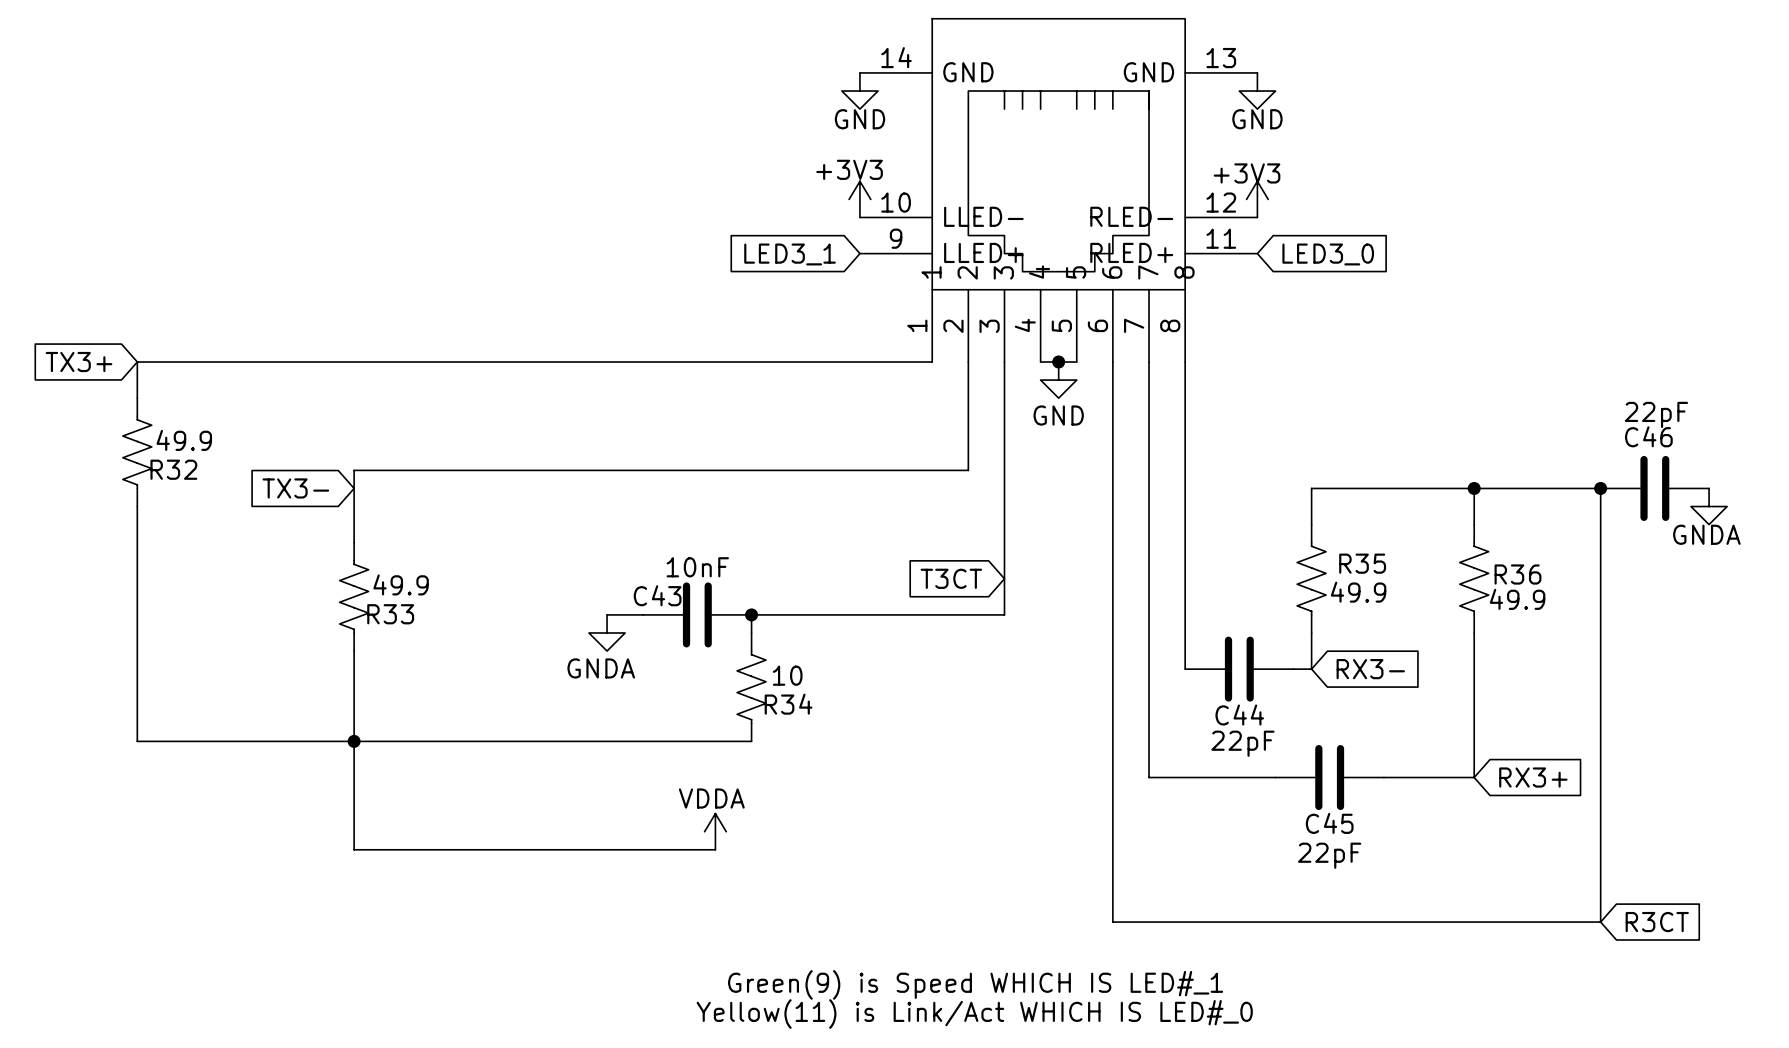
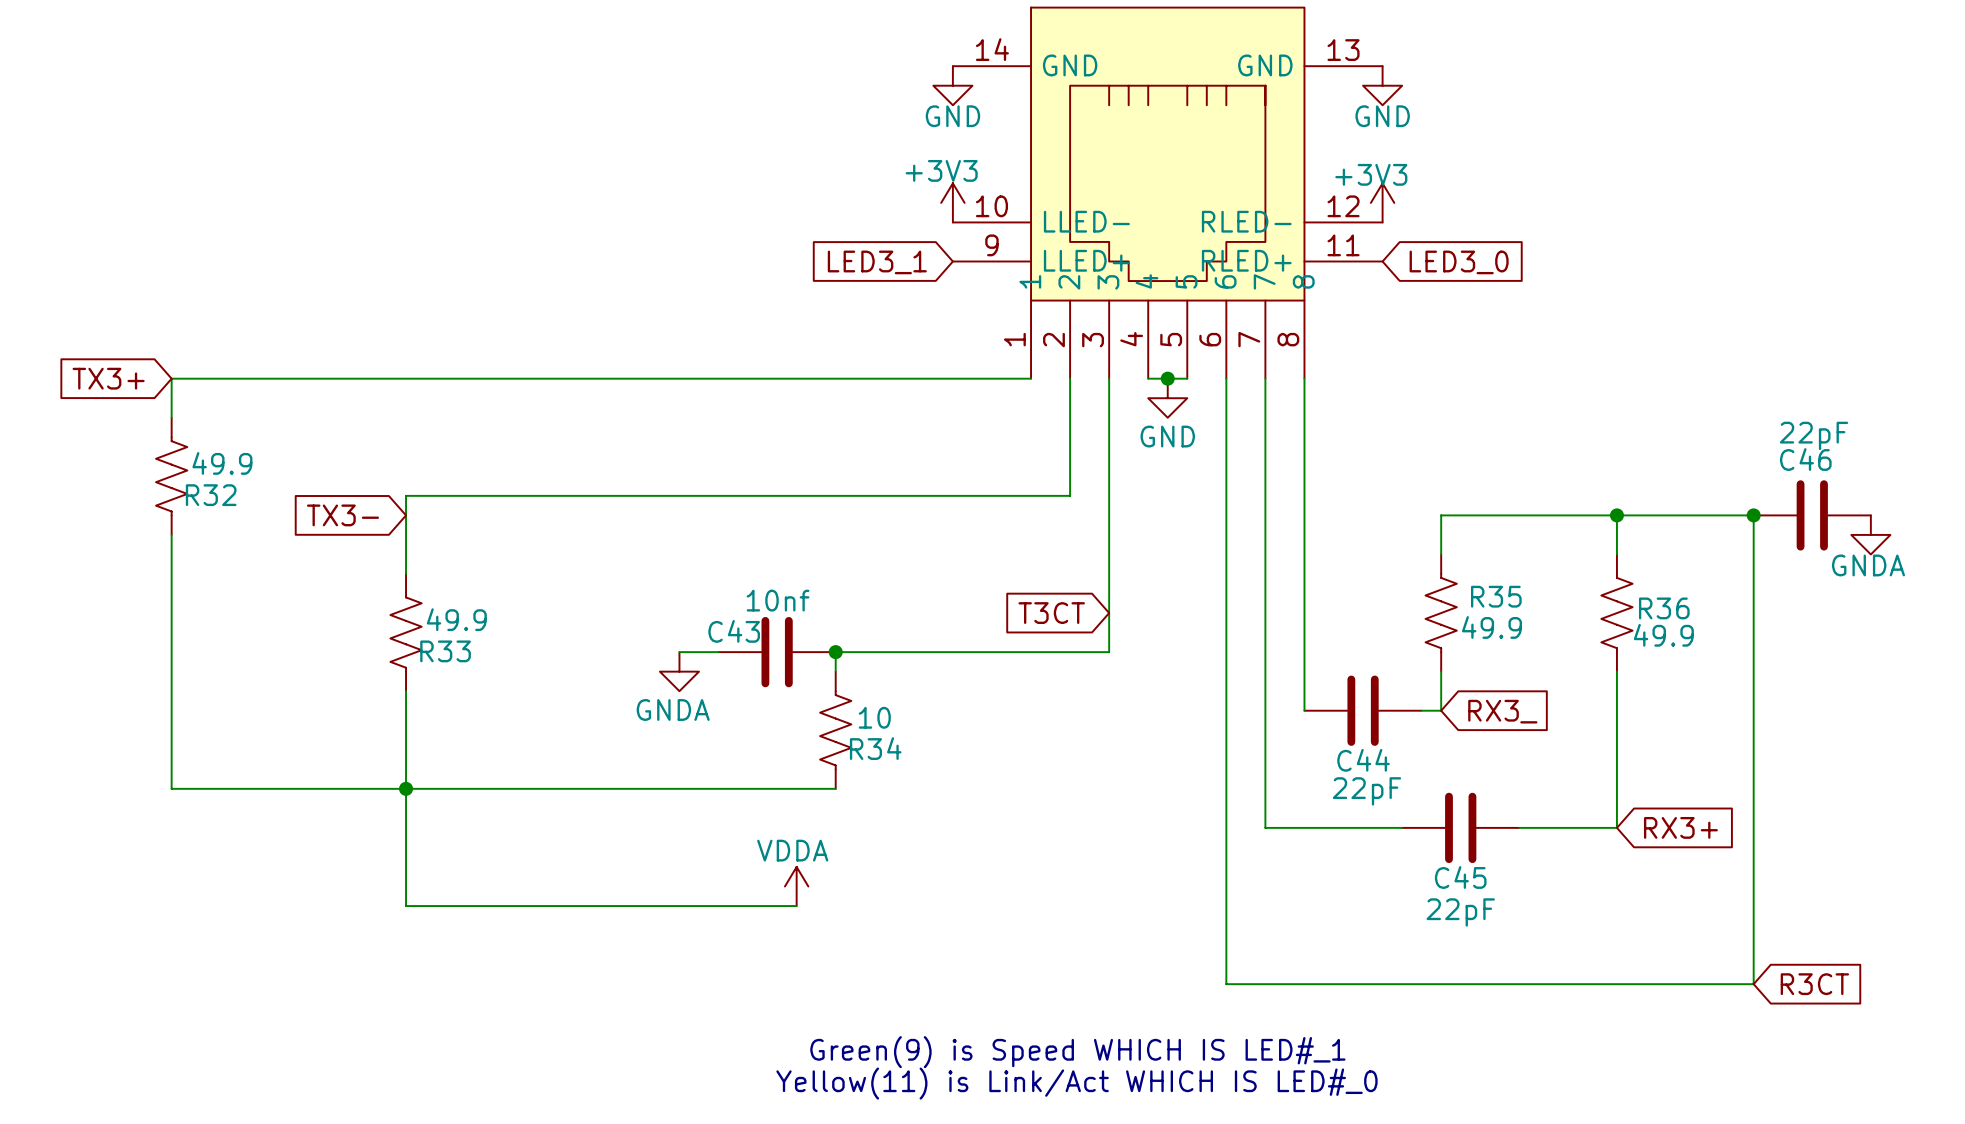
C43 value: 10nF (697, 567) -> 10nf (778, 600)
global label: RX3- (1370, 669) -> RX3_ (1502, 711)

